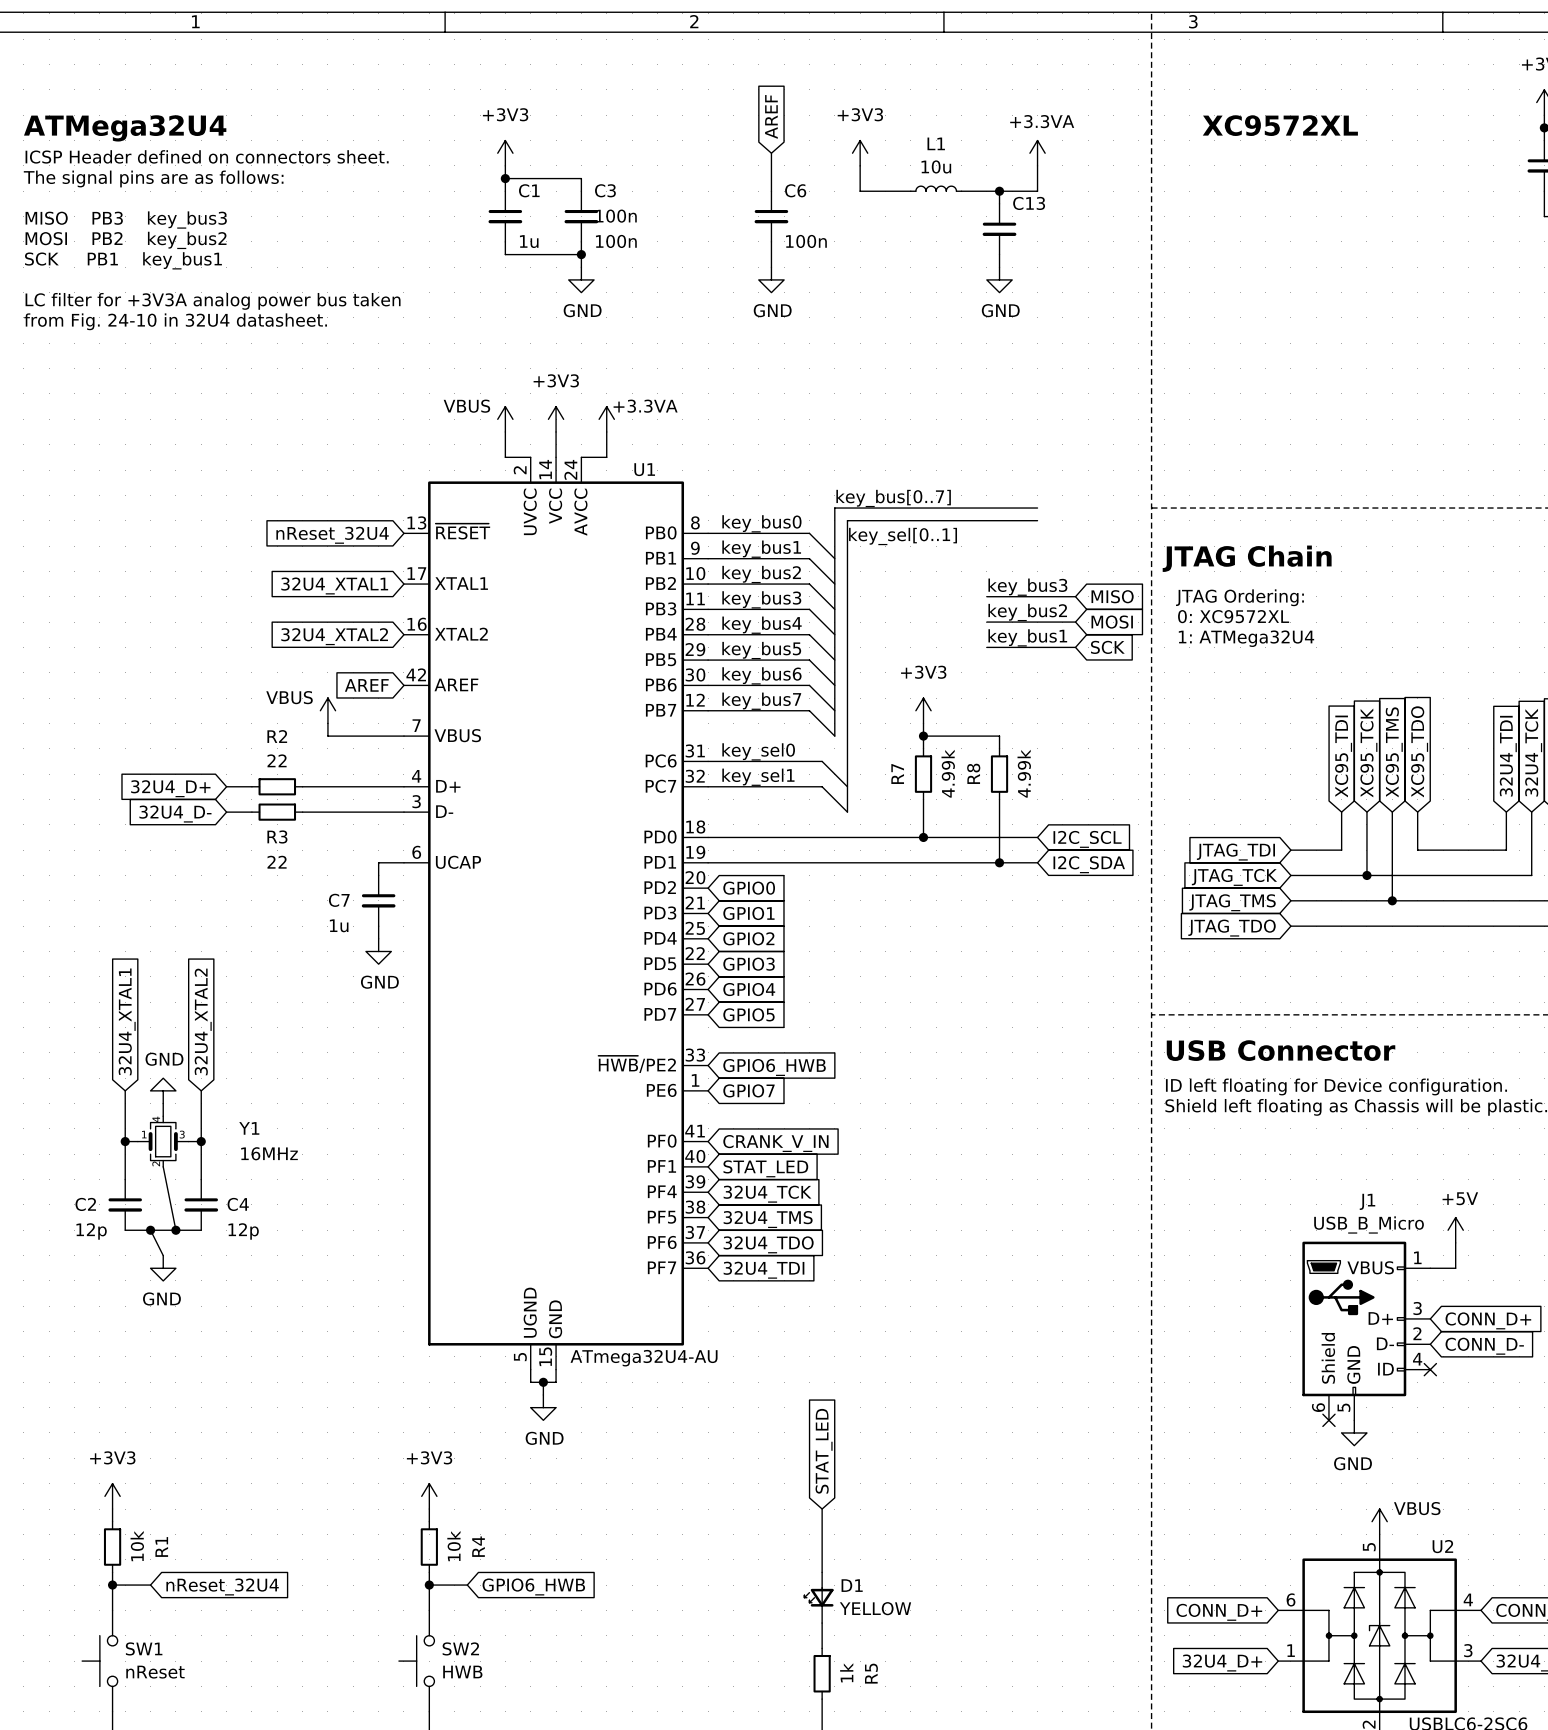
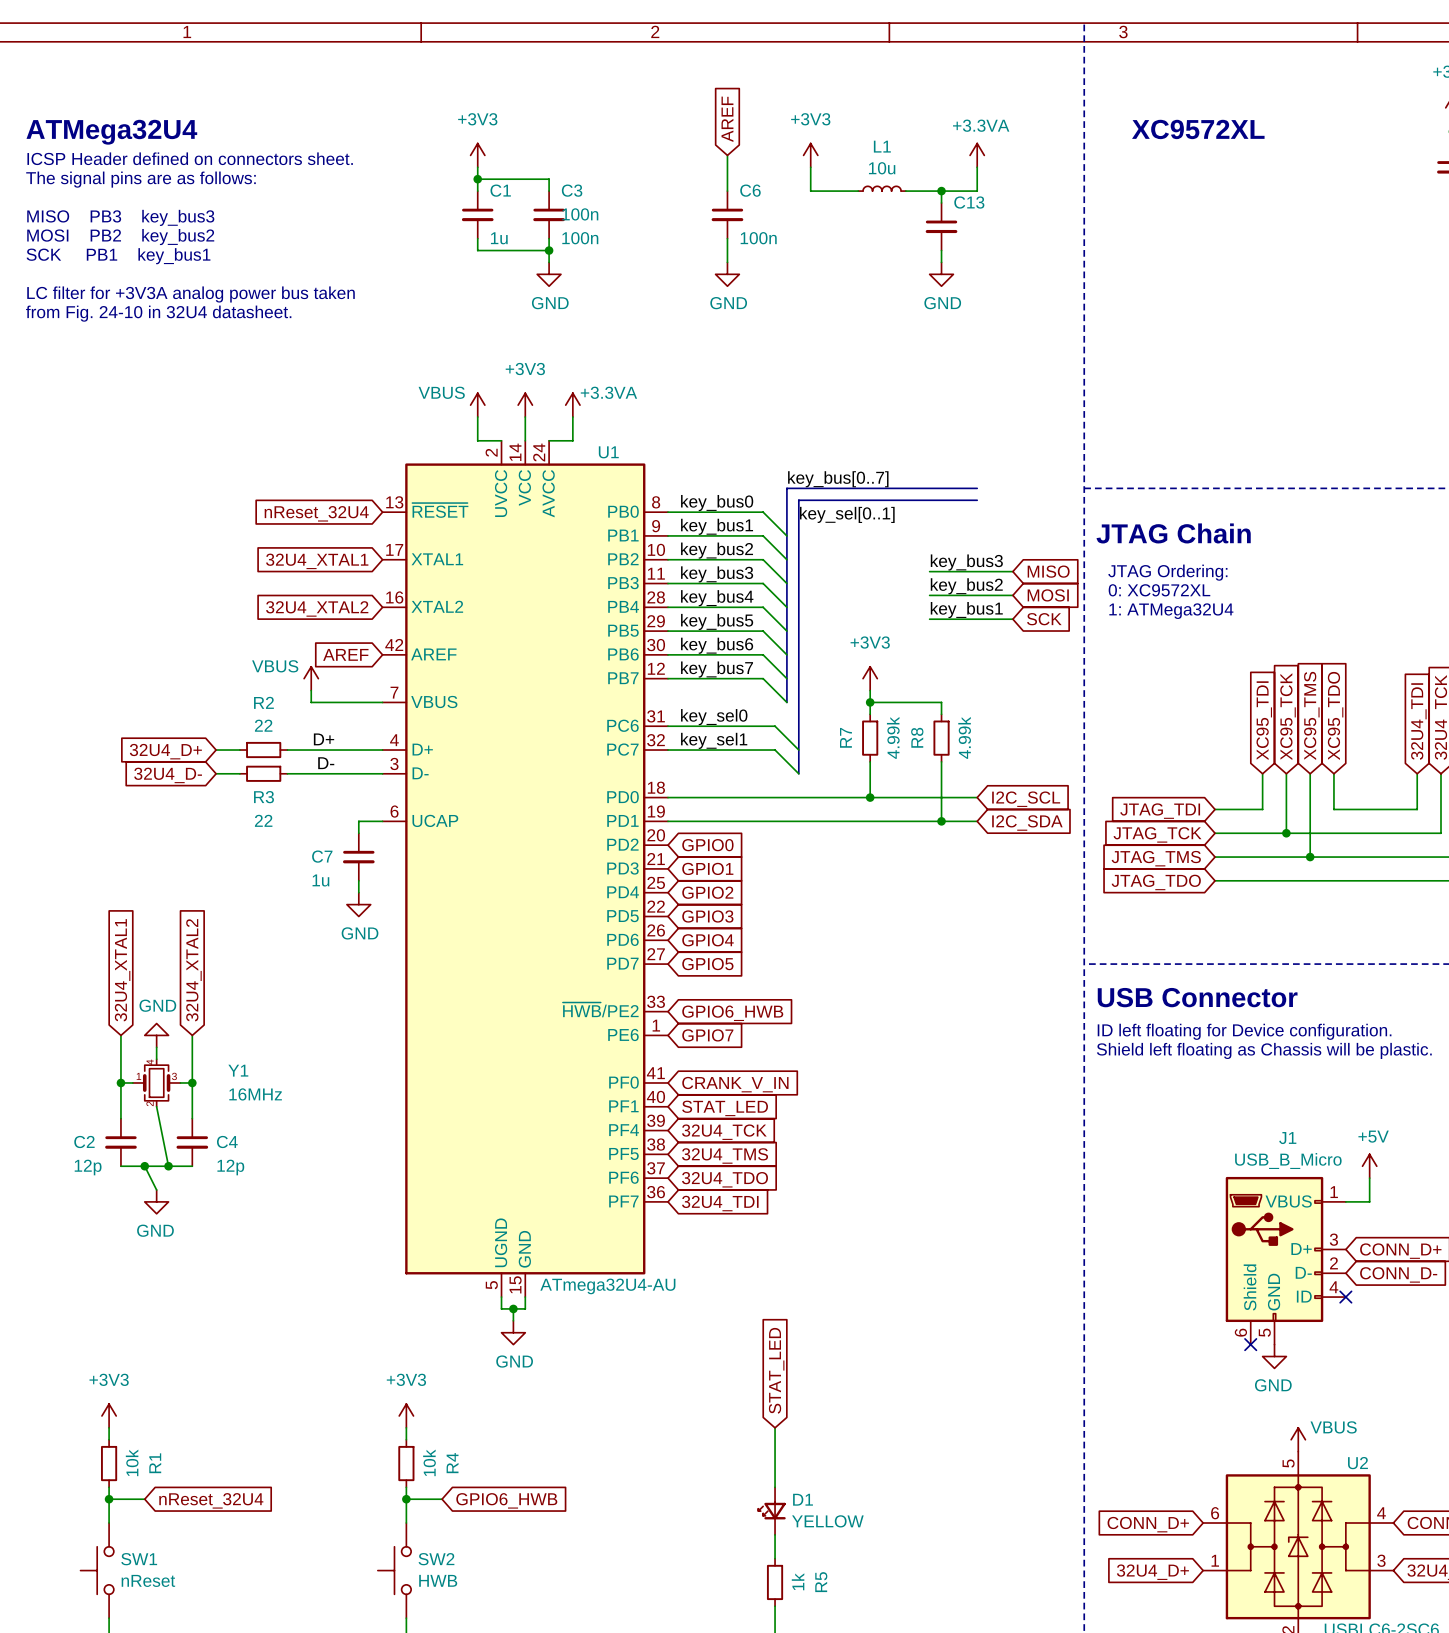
label: none -> D+ (324, 739)
label: none -> D- (326, 763)

